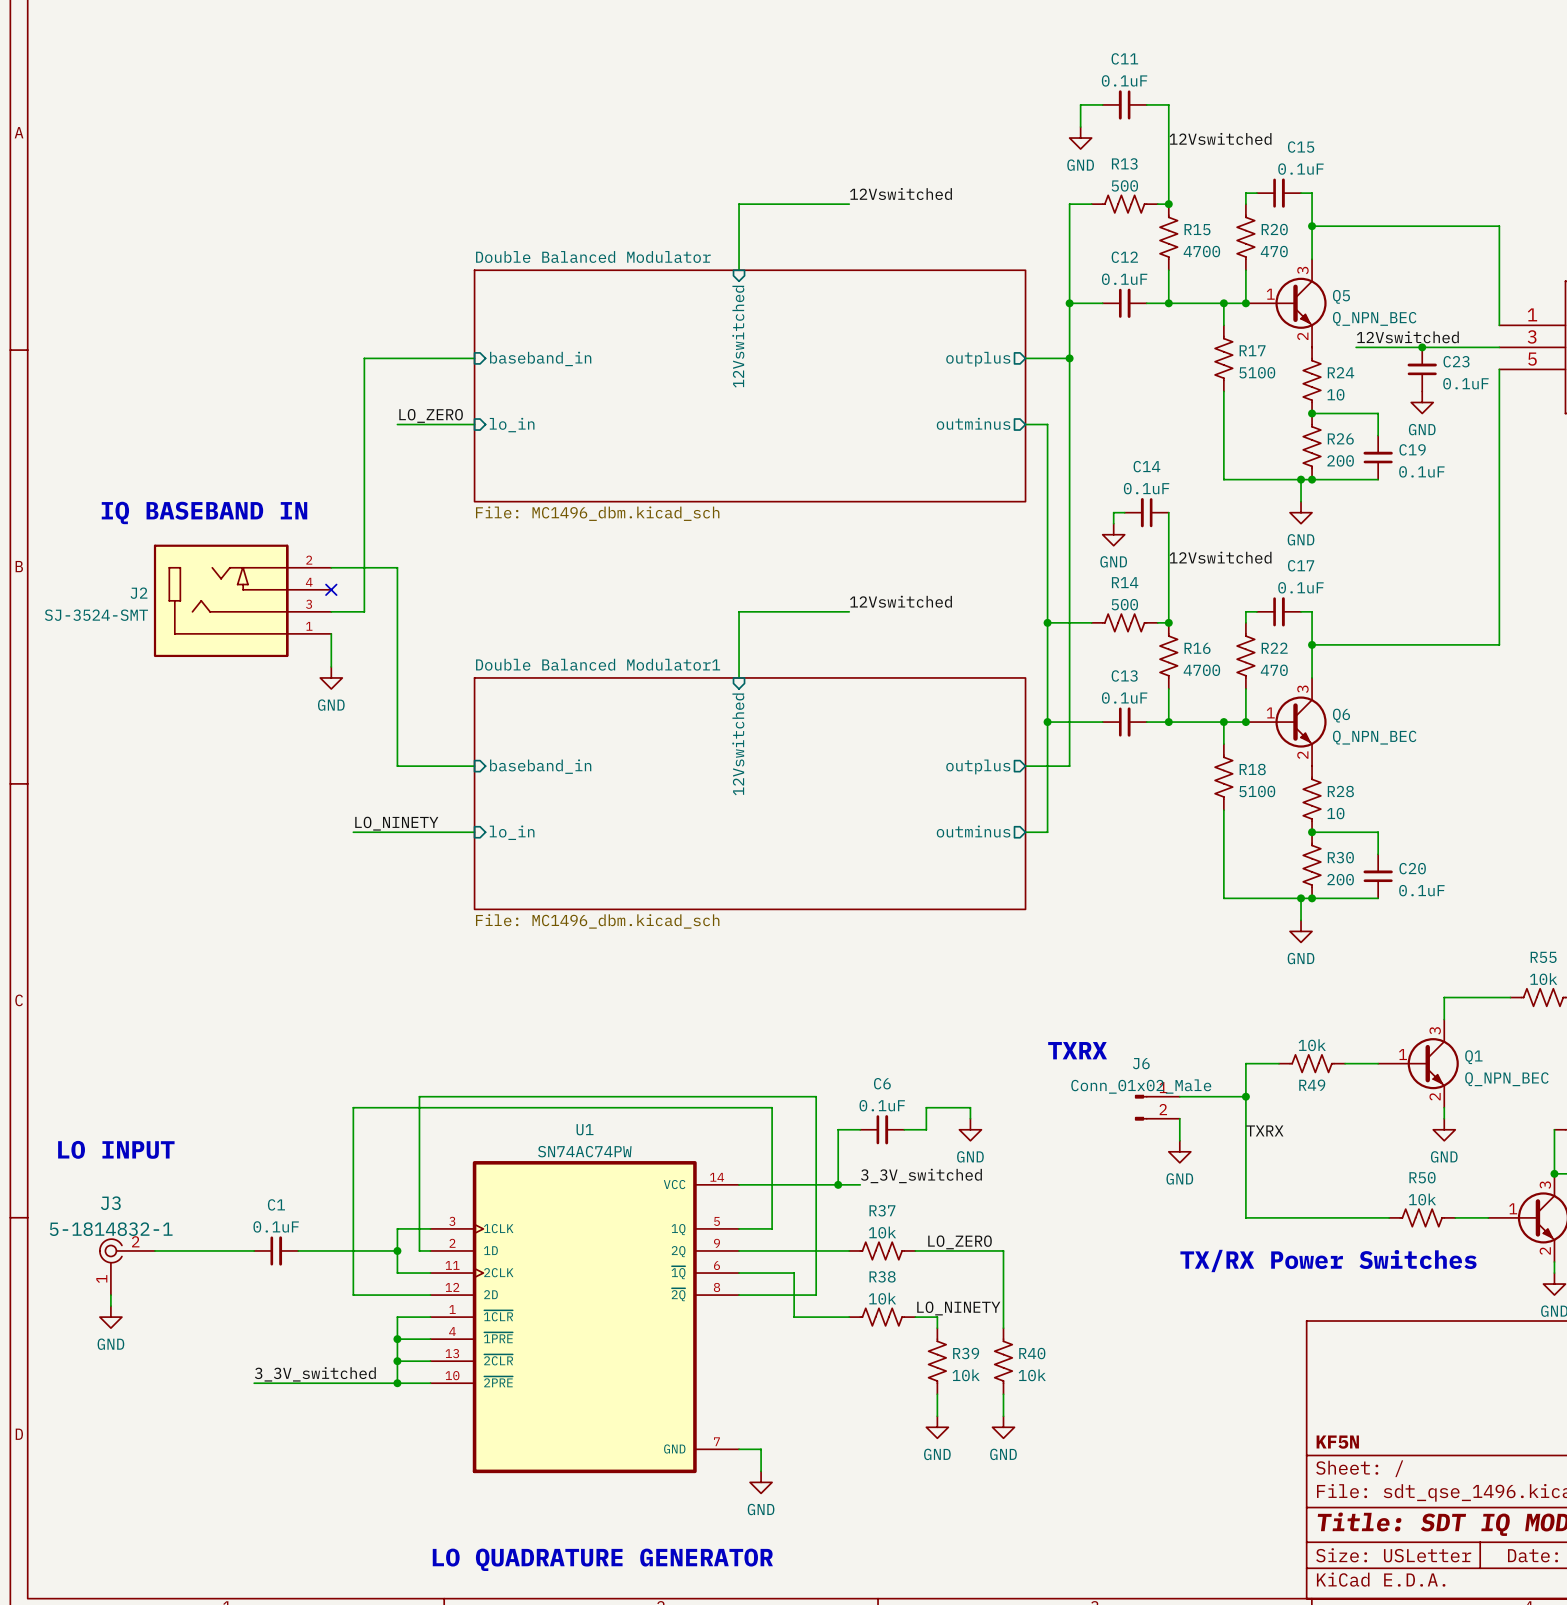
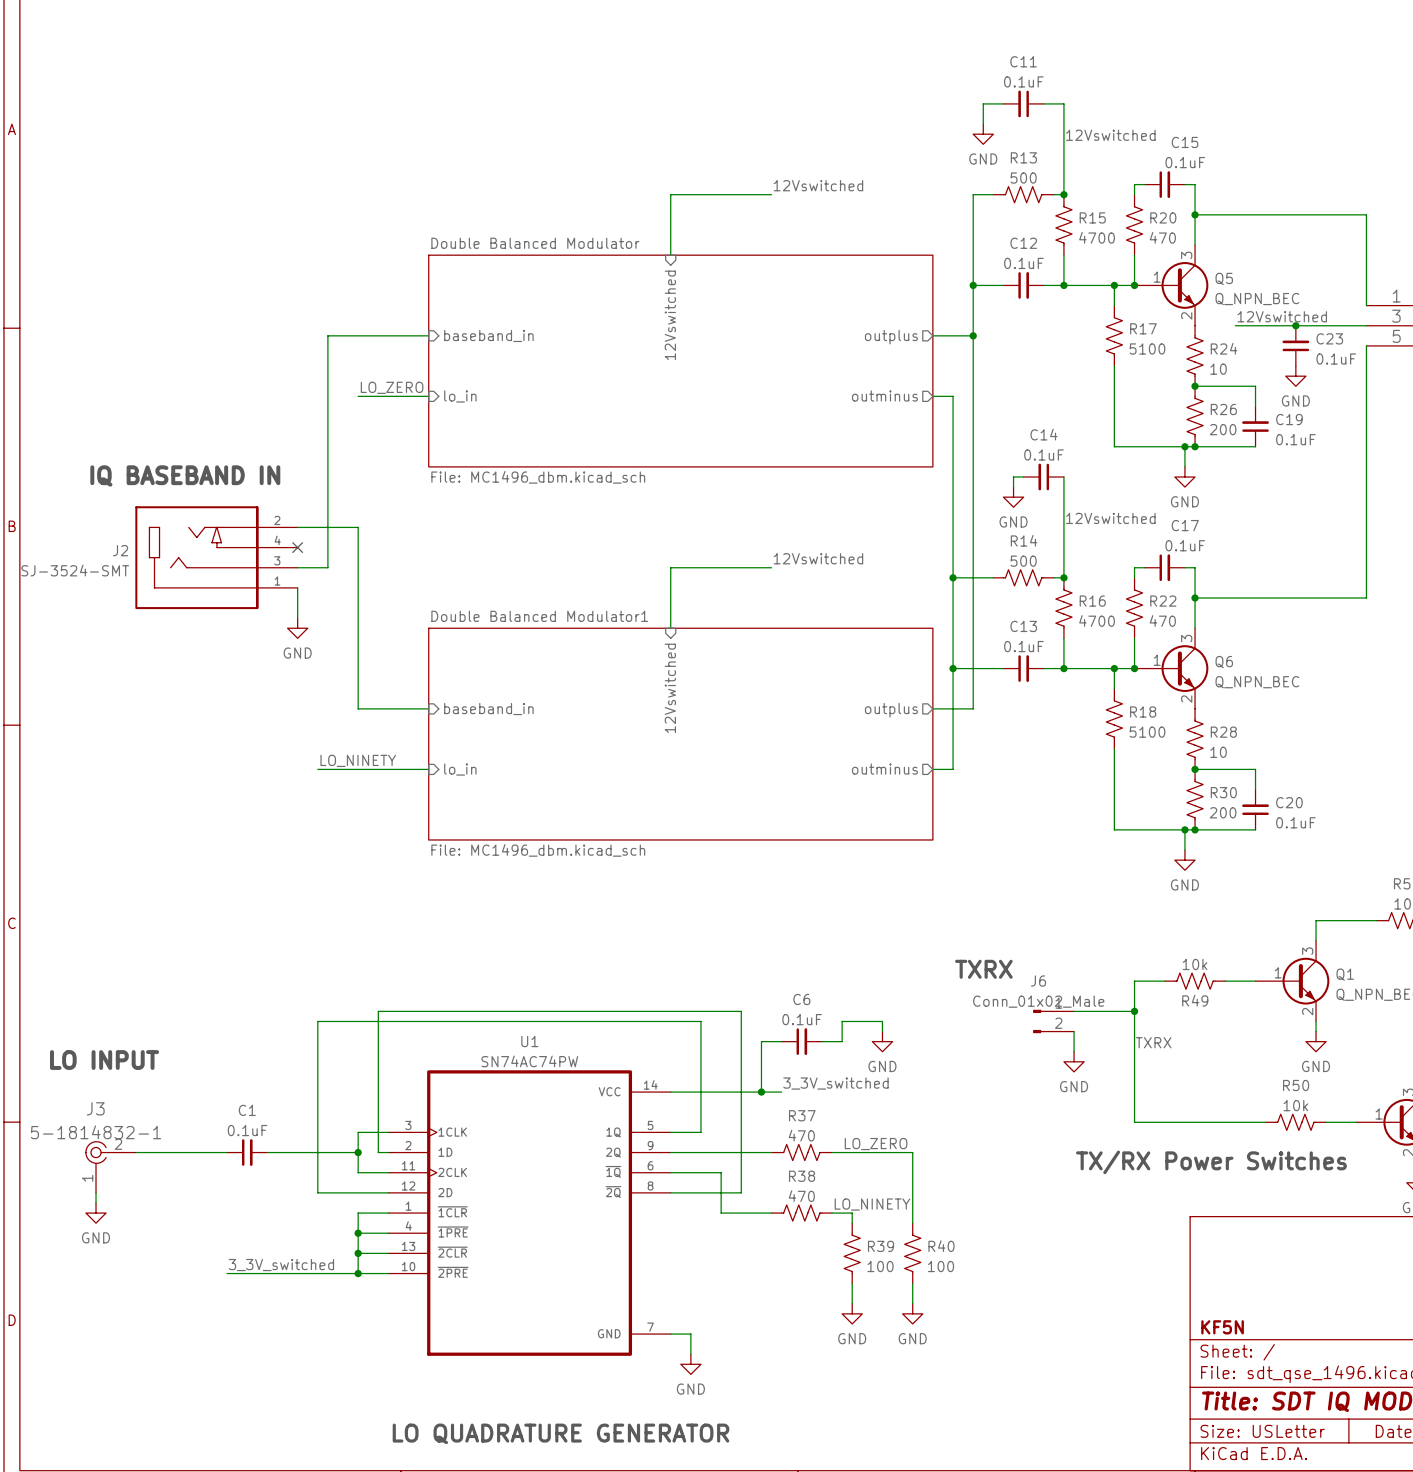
R37 value: 10k (882, 1232) -> 470 (801, 1135)
R38 value: 10k (882, 1298) -> 470 (801, 1196)
R39 value: 10k (966, 1375) -> 100 (880, 1266)
R40 value: 10k (1032, 1375) -> 100 (941, 1266)

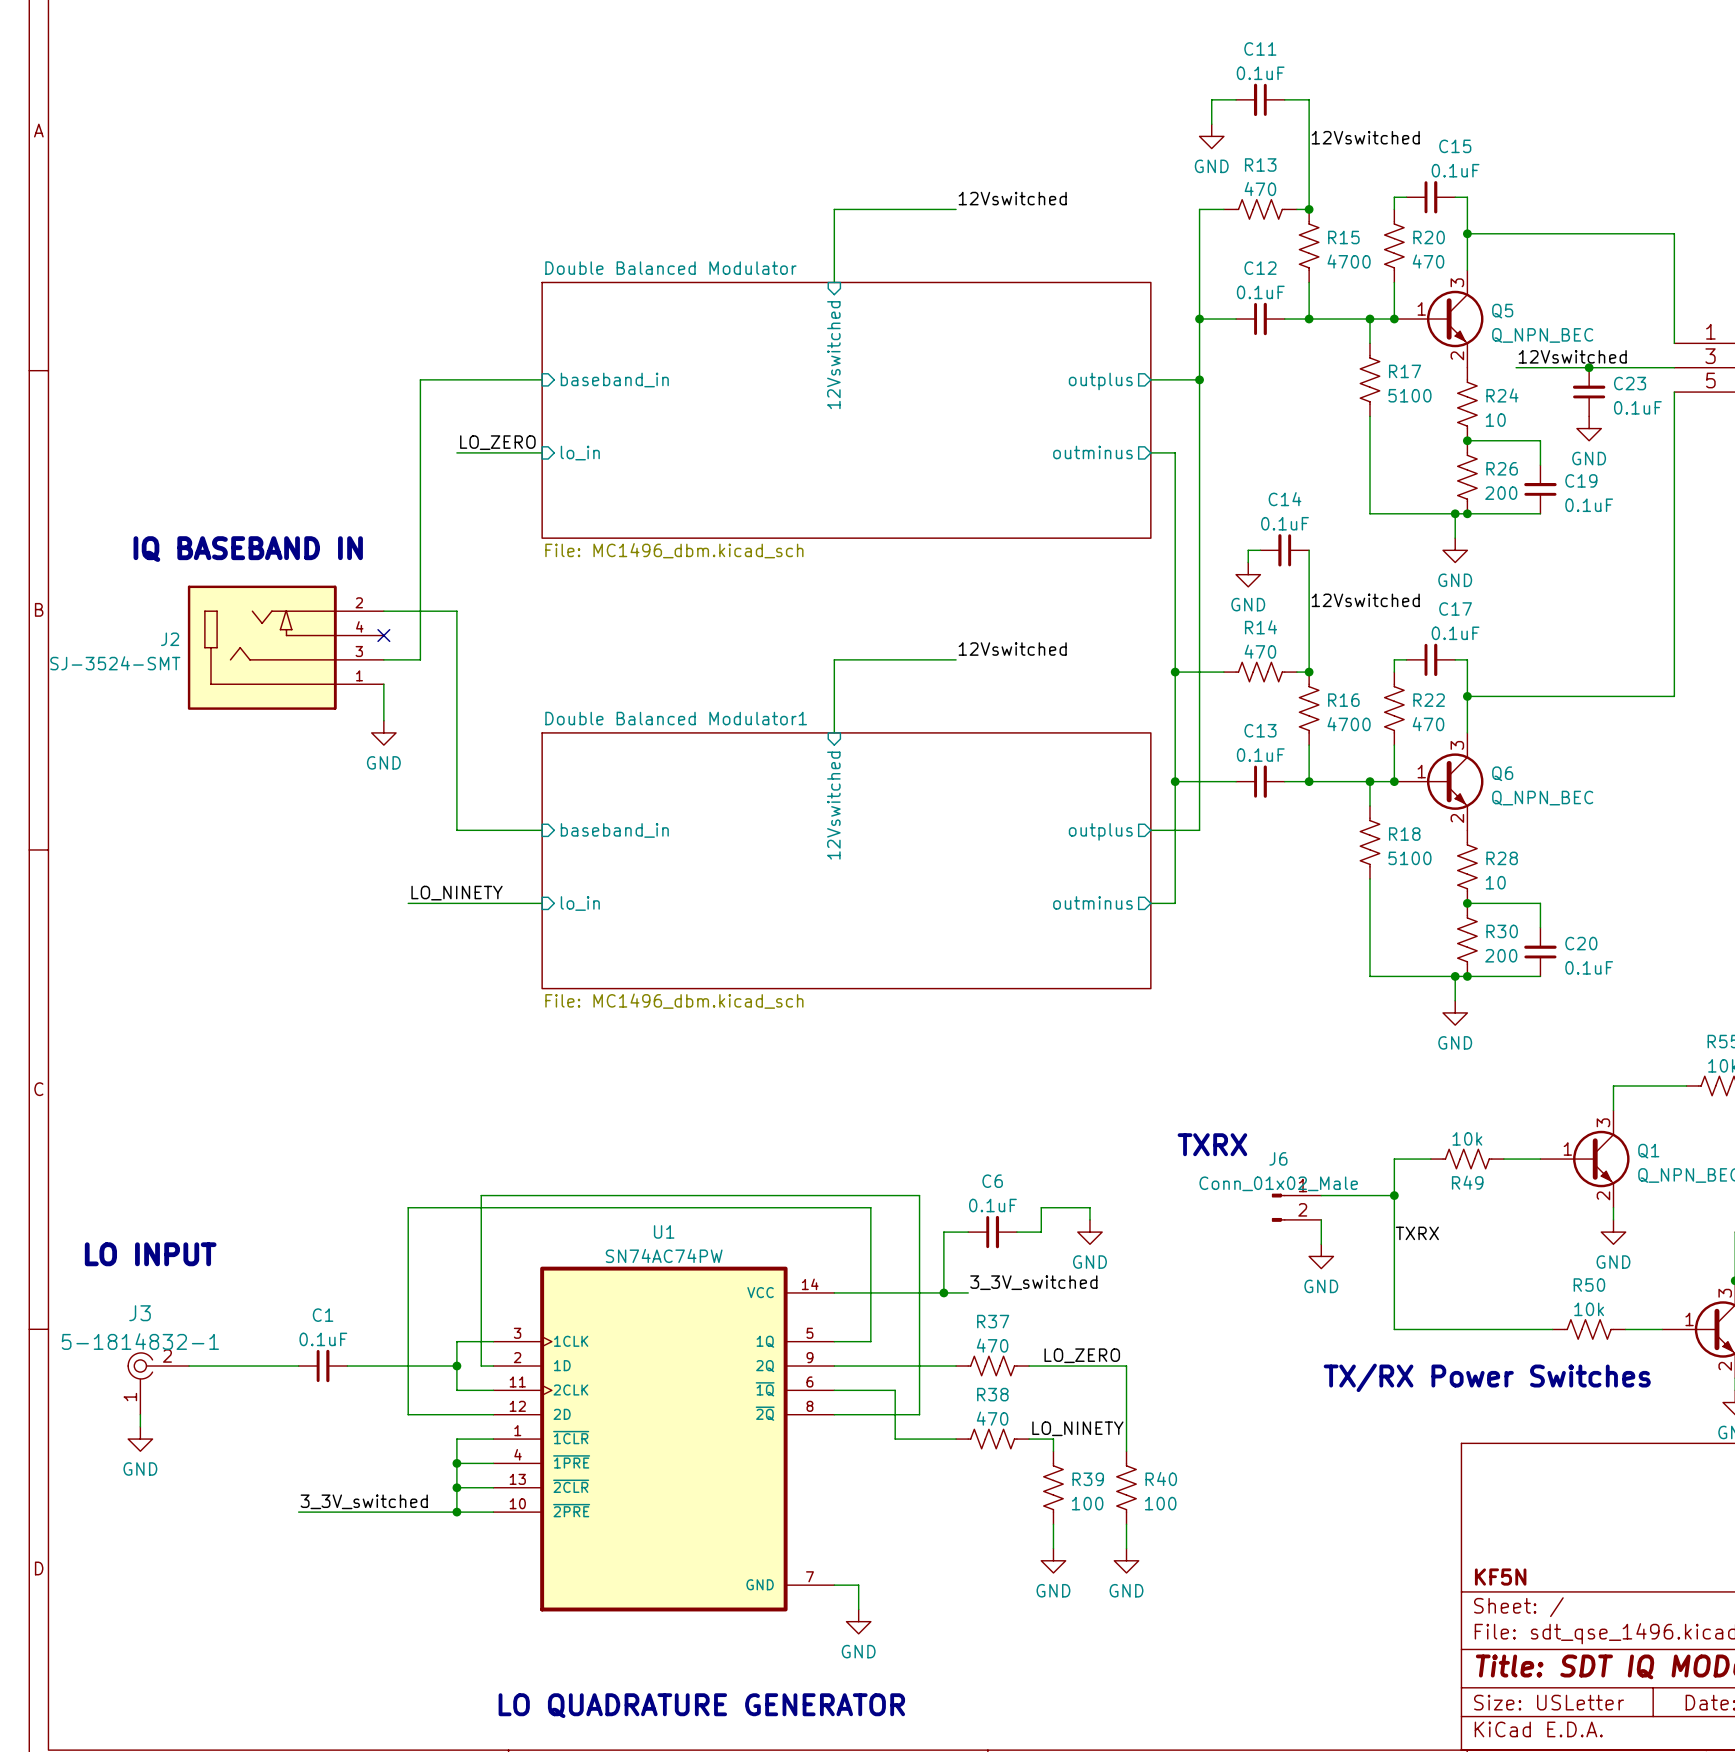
R13 value: 500 (1023, 178) -> 470 (1260, 189)
R14 value: 500 (1023, 561) -> 470 (1260, 651)

